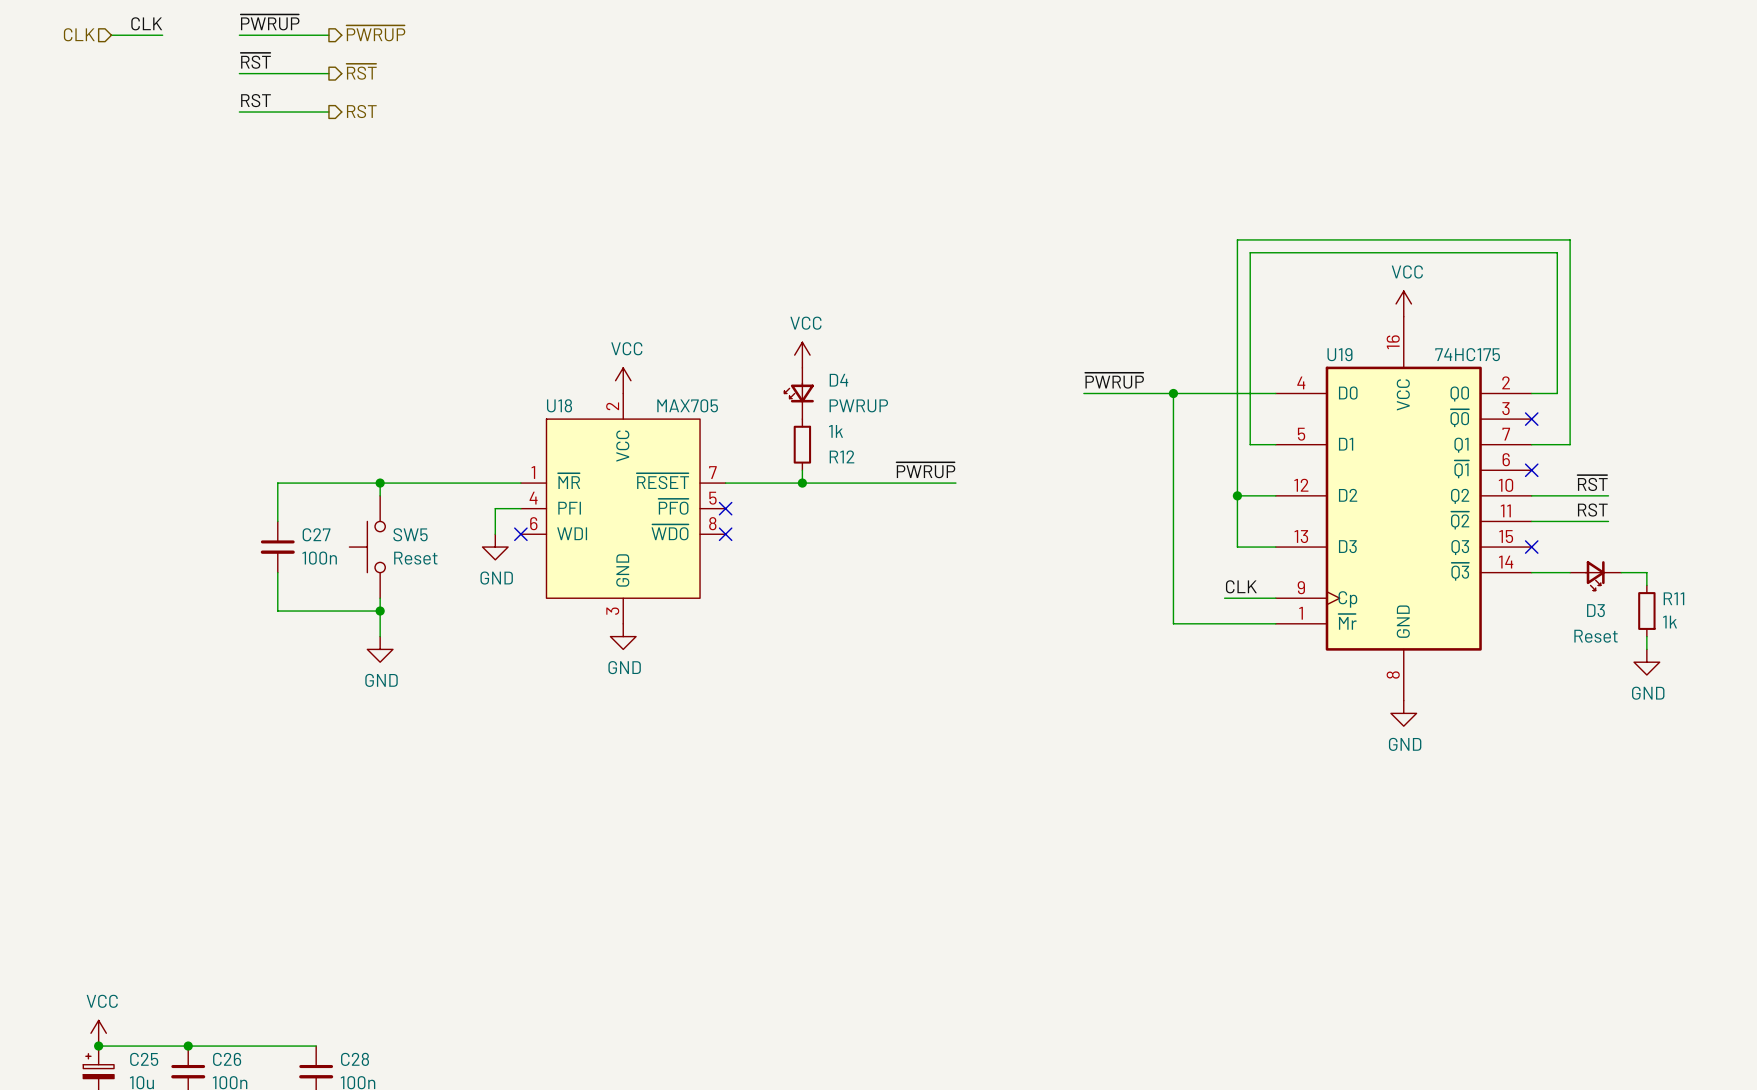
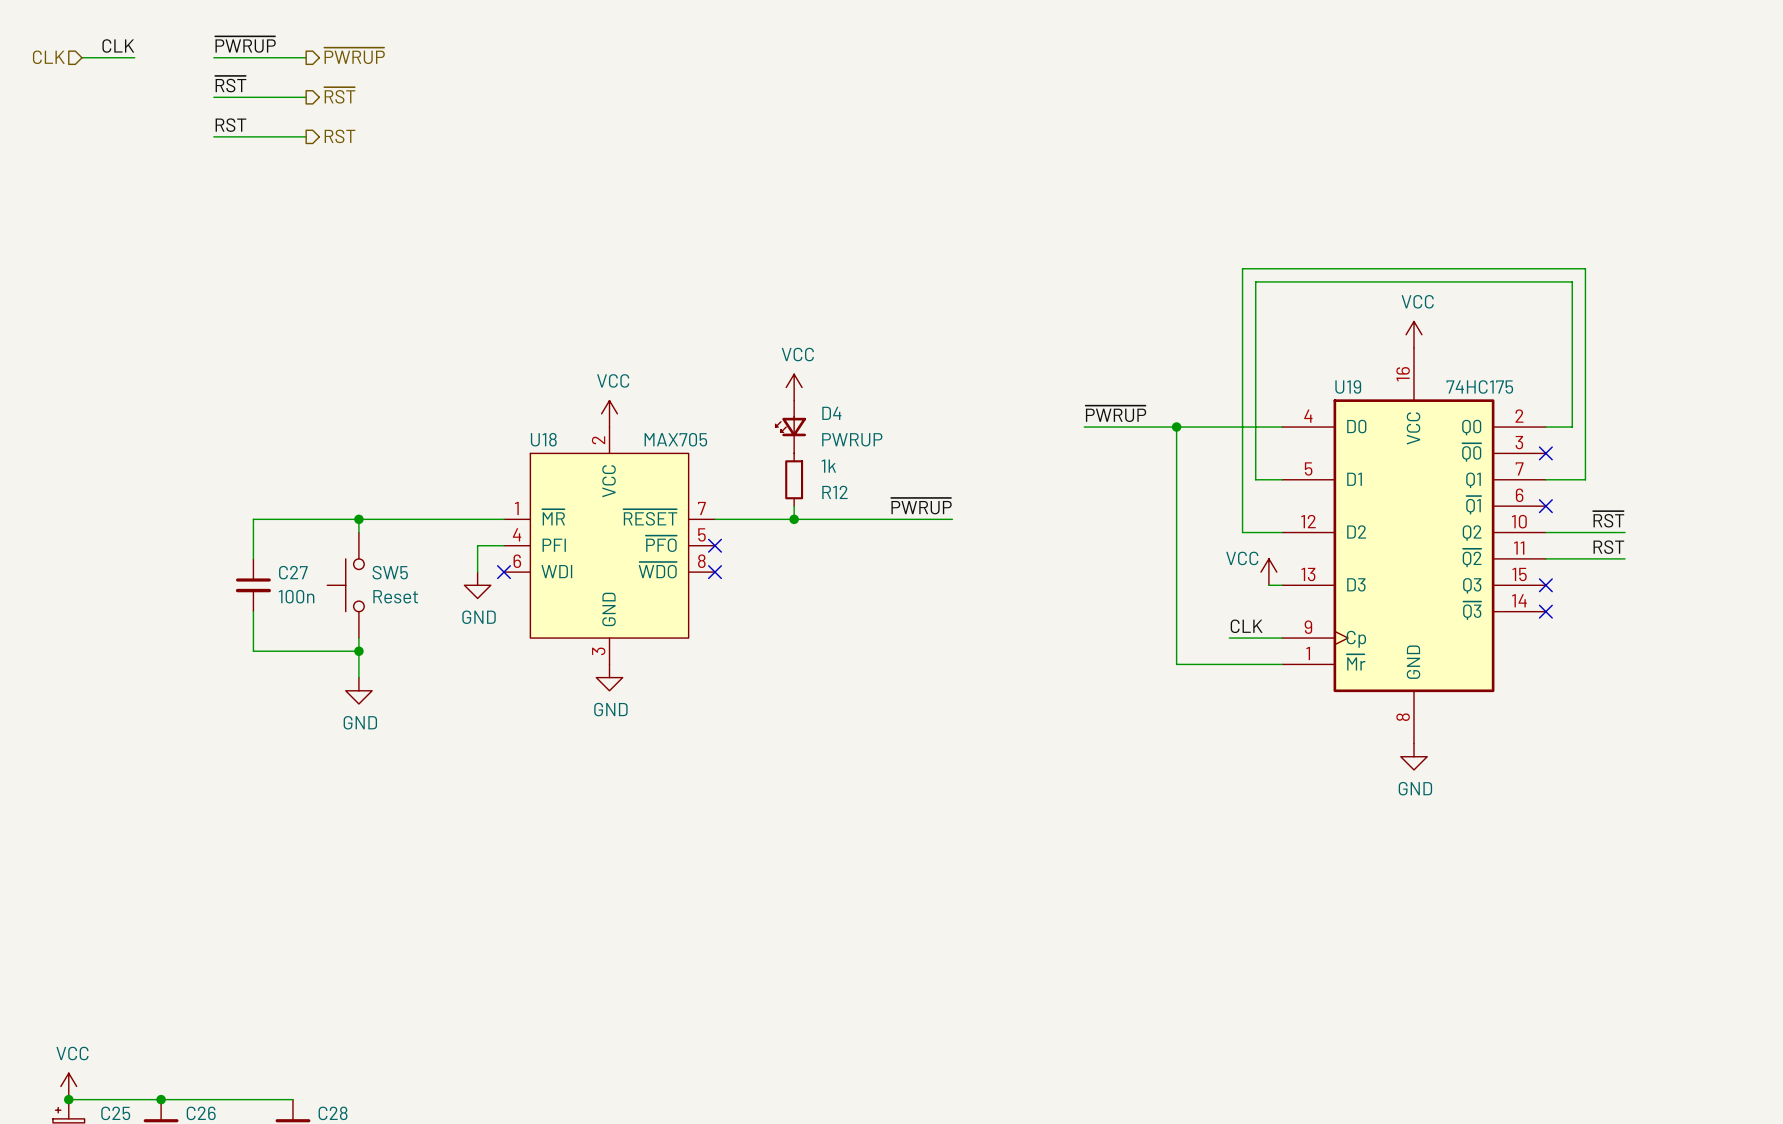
wire: (1237, 495) (1237, 547) (1263, 547) -> none
junction: (1237, 495) -> none
power symbol: none -> VCC (1268, 572)
wire: (1531, 572) (1570, 572) -> none
no-connect mark: none -> (1545, 611)
wire: (1621, 572) (1646, 572) (1646, 585) -> none
D3: Reset (1595, 575) -> none
R11: 1k (1646, 611) -> none
wire: (1646, 636) (1646, 649) -> none
power symbol: GND (1646, 662) -> none

